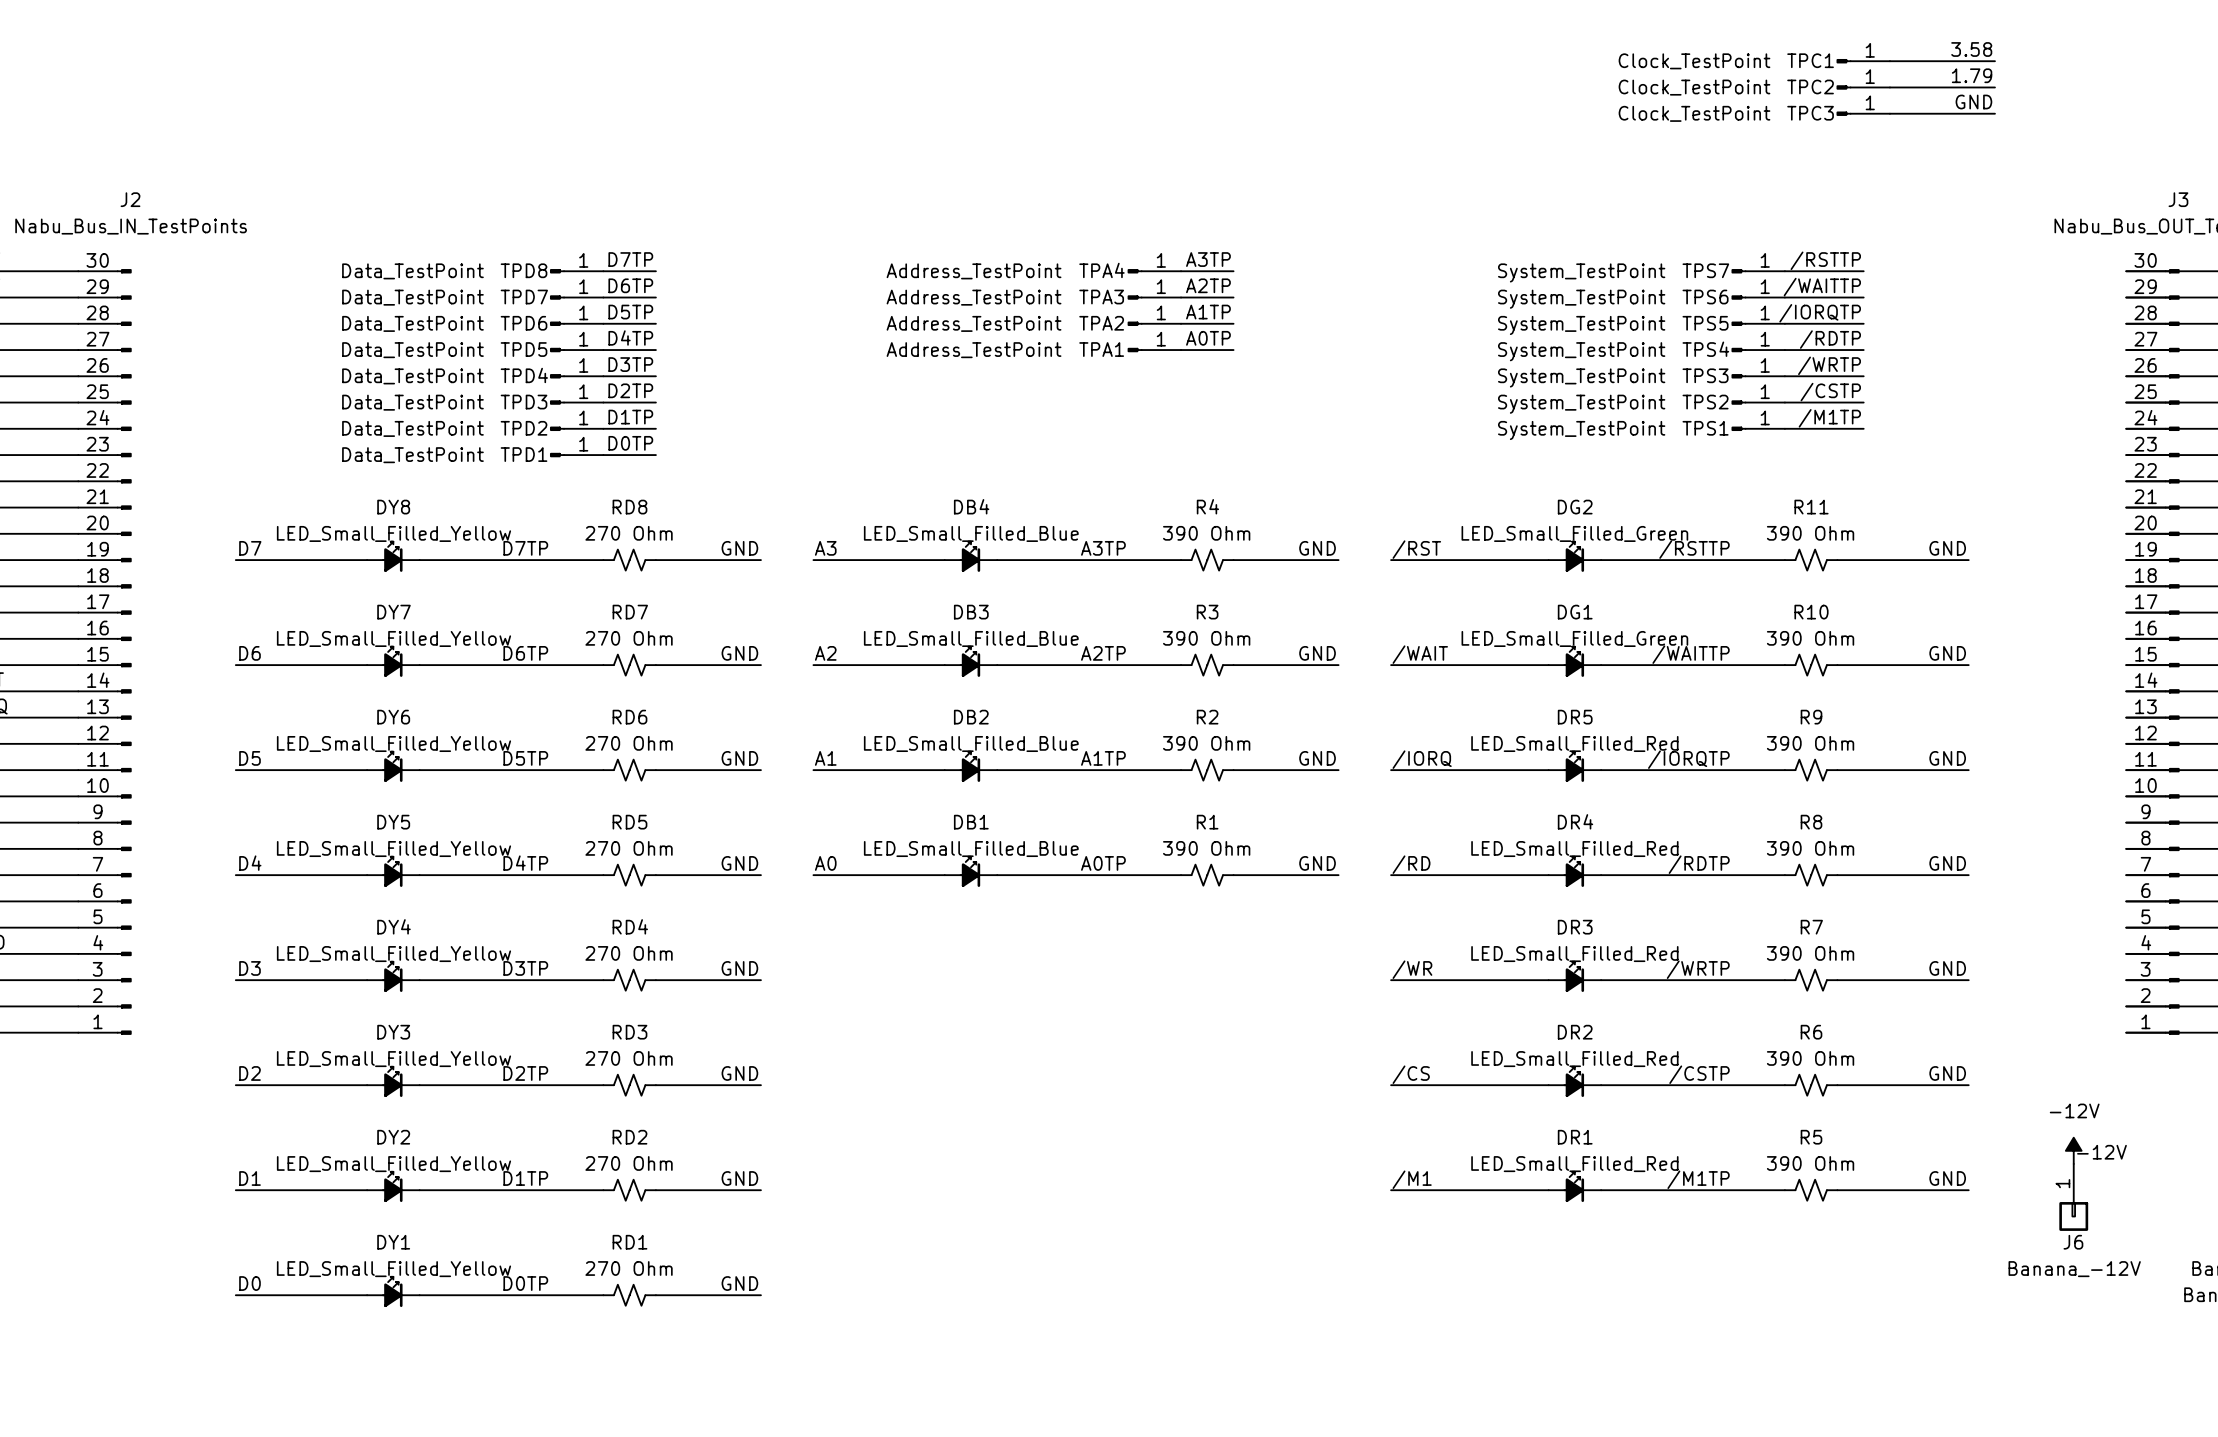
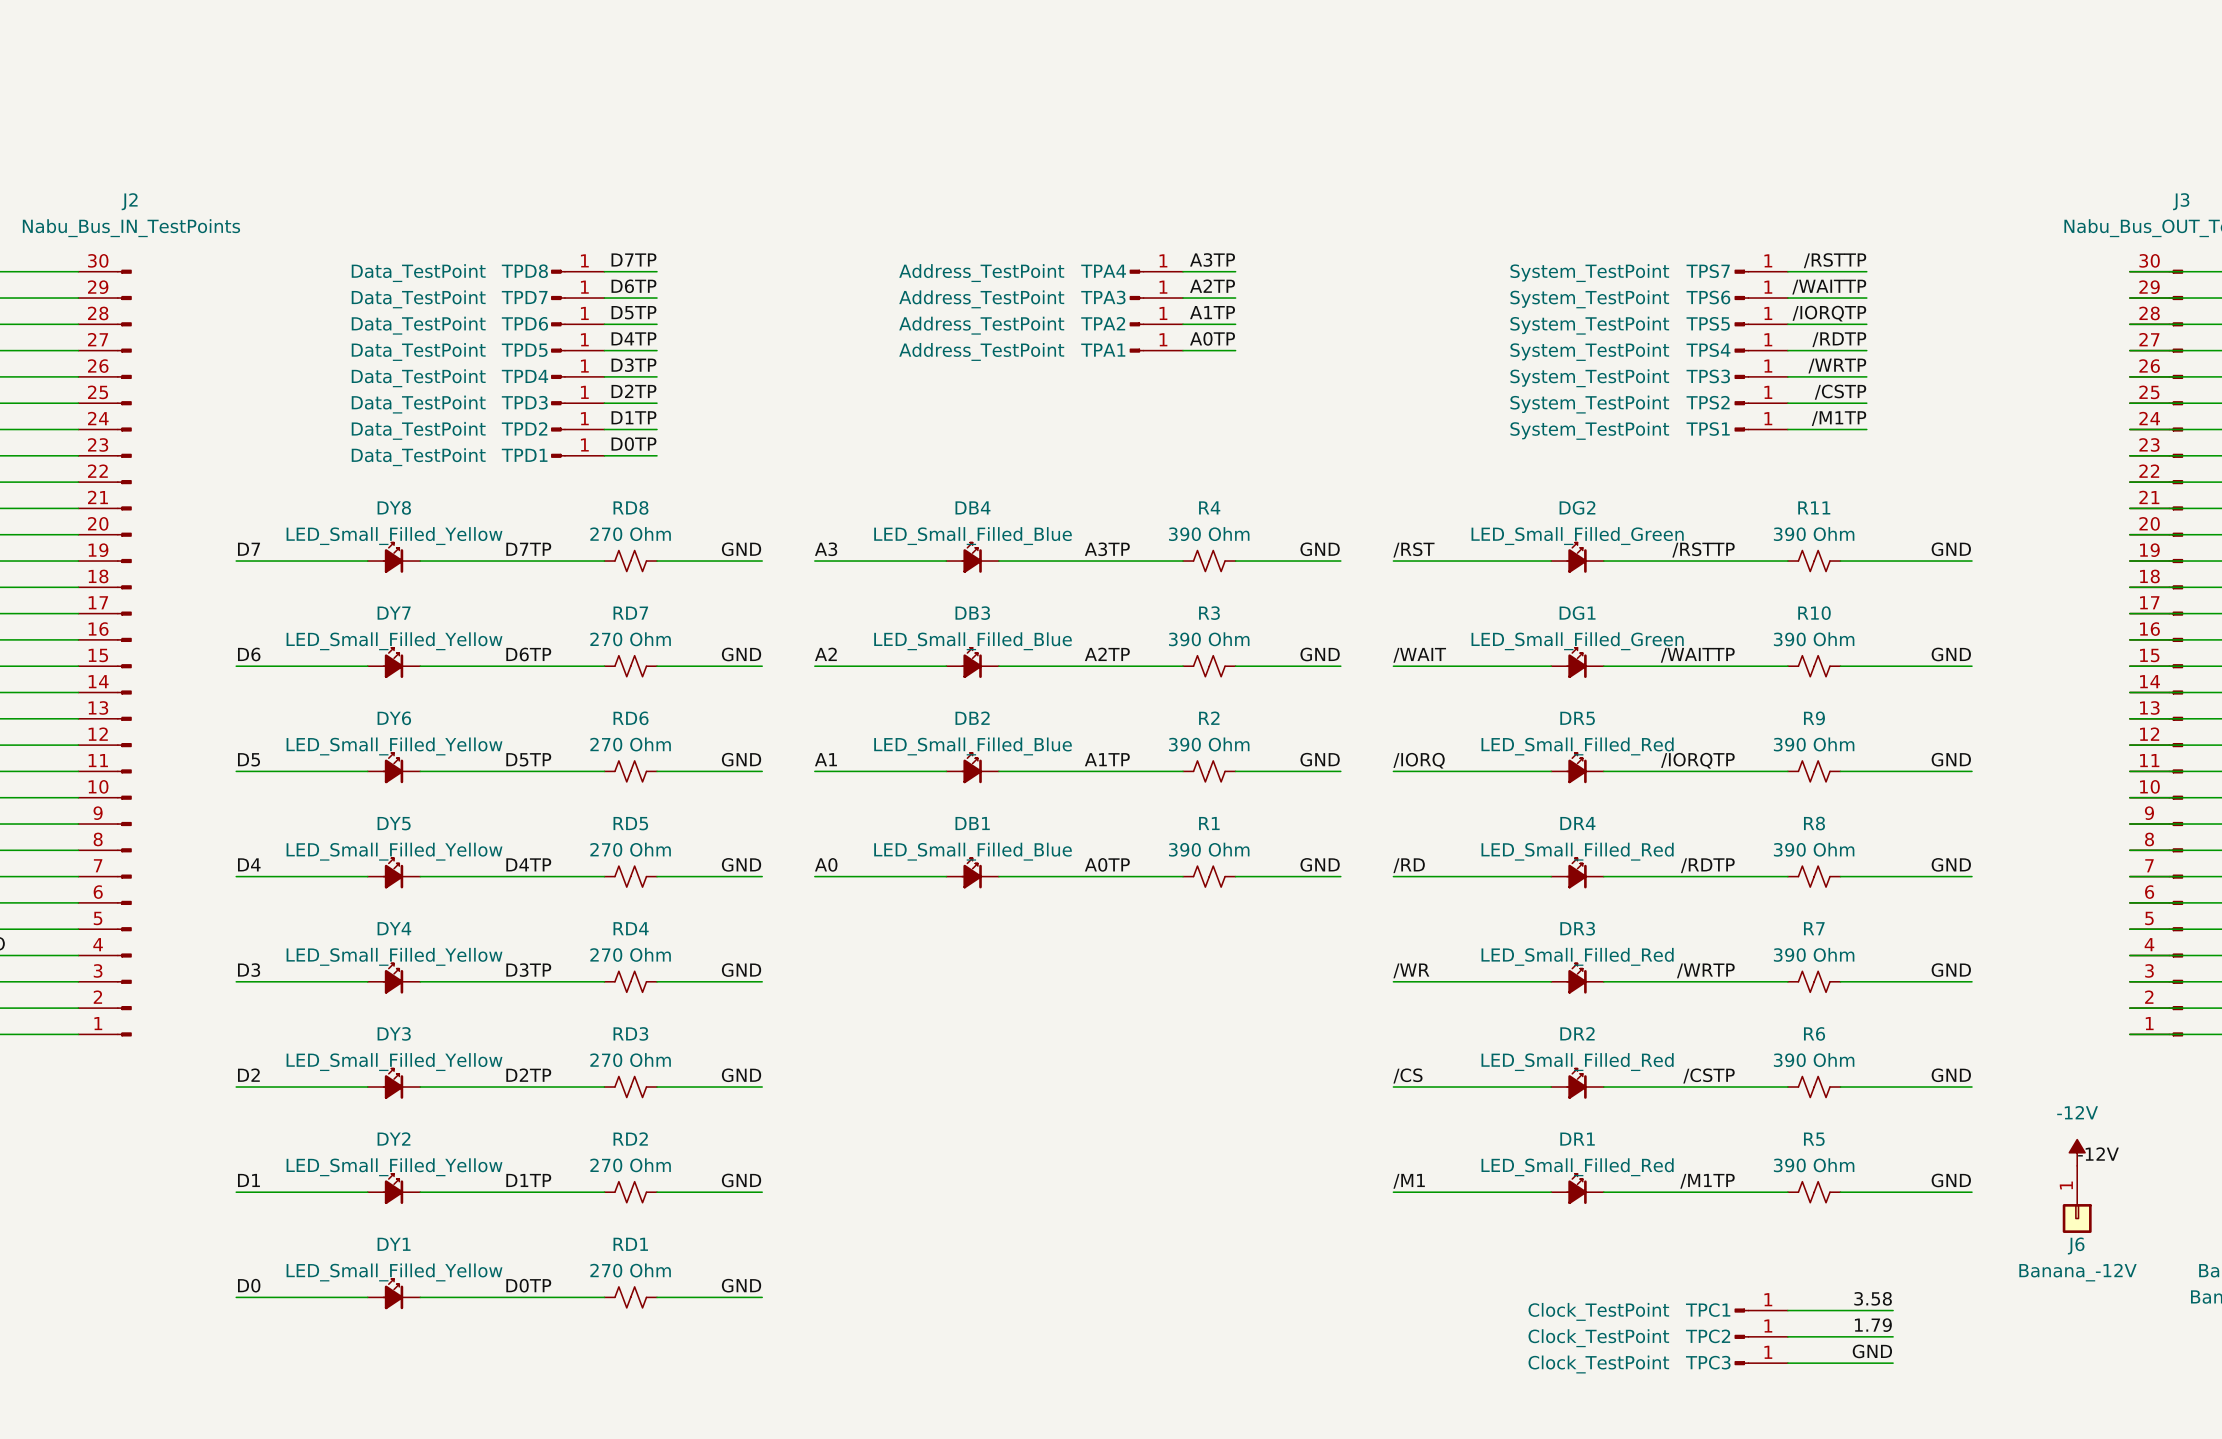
label: 3.58 (1971, 49) -> none
TPC1 position: (1863, 61) -> (1761, 1310)
wire: (1889, 61) (1994, 61) -> none
label: 1.79 (1972, 75) -> none
TPC2 position: (1863, 87) -> (1761, 1336)
wire: (1889, 87) (1994, 87) -> none
label: GND (1973, 102) -> none
TPC3 position: (1863, 113) -> (1761, 1363)
wire: (1889, 113) (1994, 113) -> none
label: none -> 3.58 (1873, 1298)
wire: none -> (1787, 1310) (1893, 1310)
label: none -> 1.79 (1873, 1325)
wire: none -> (1787, 1336) (1893, 1336)
label: none -> GND (1872, 1351)
wire: none -> (1787, 1363) (1893, 1363)

